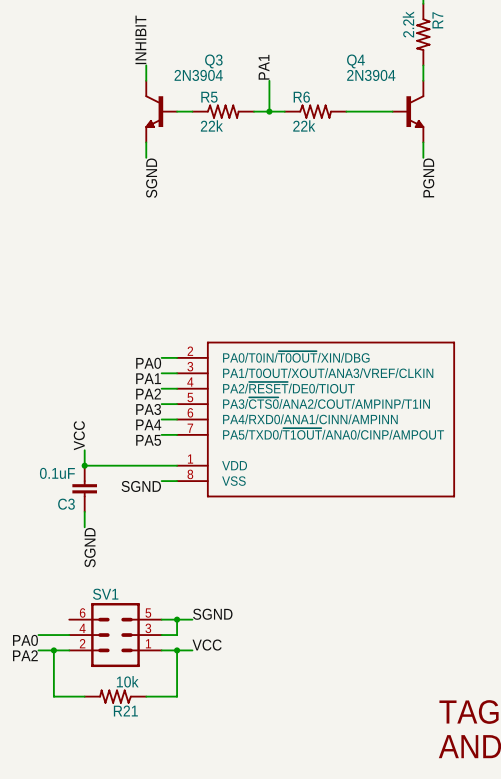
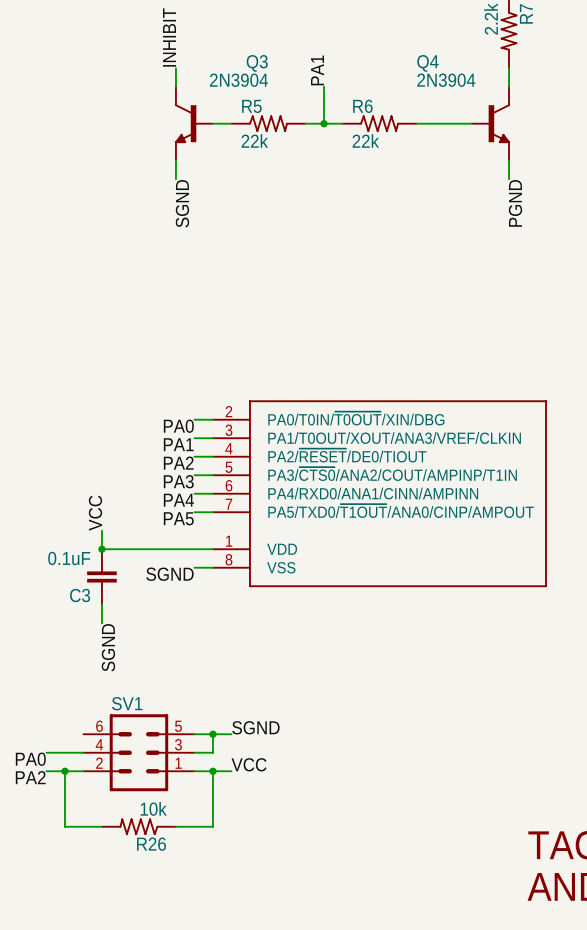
R21 name: R21 (125, 711) -> R26 (151, 844)

